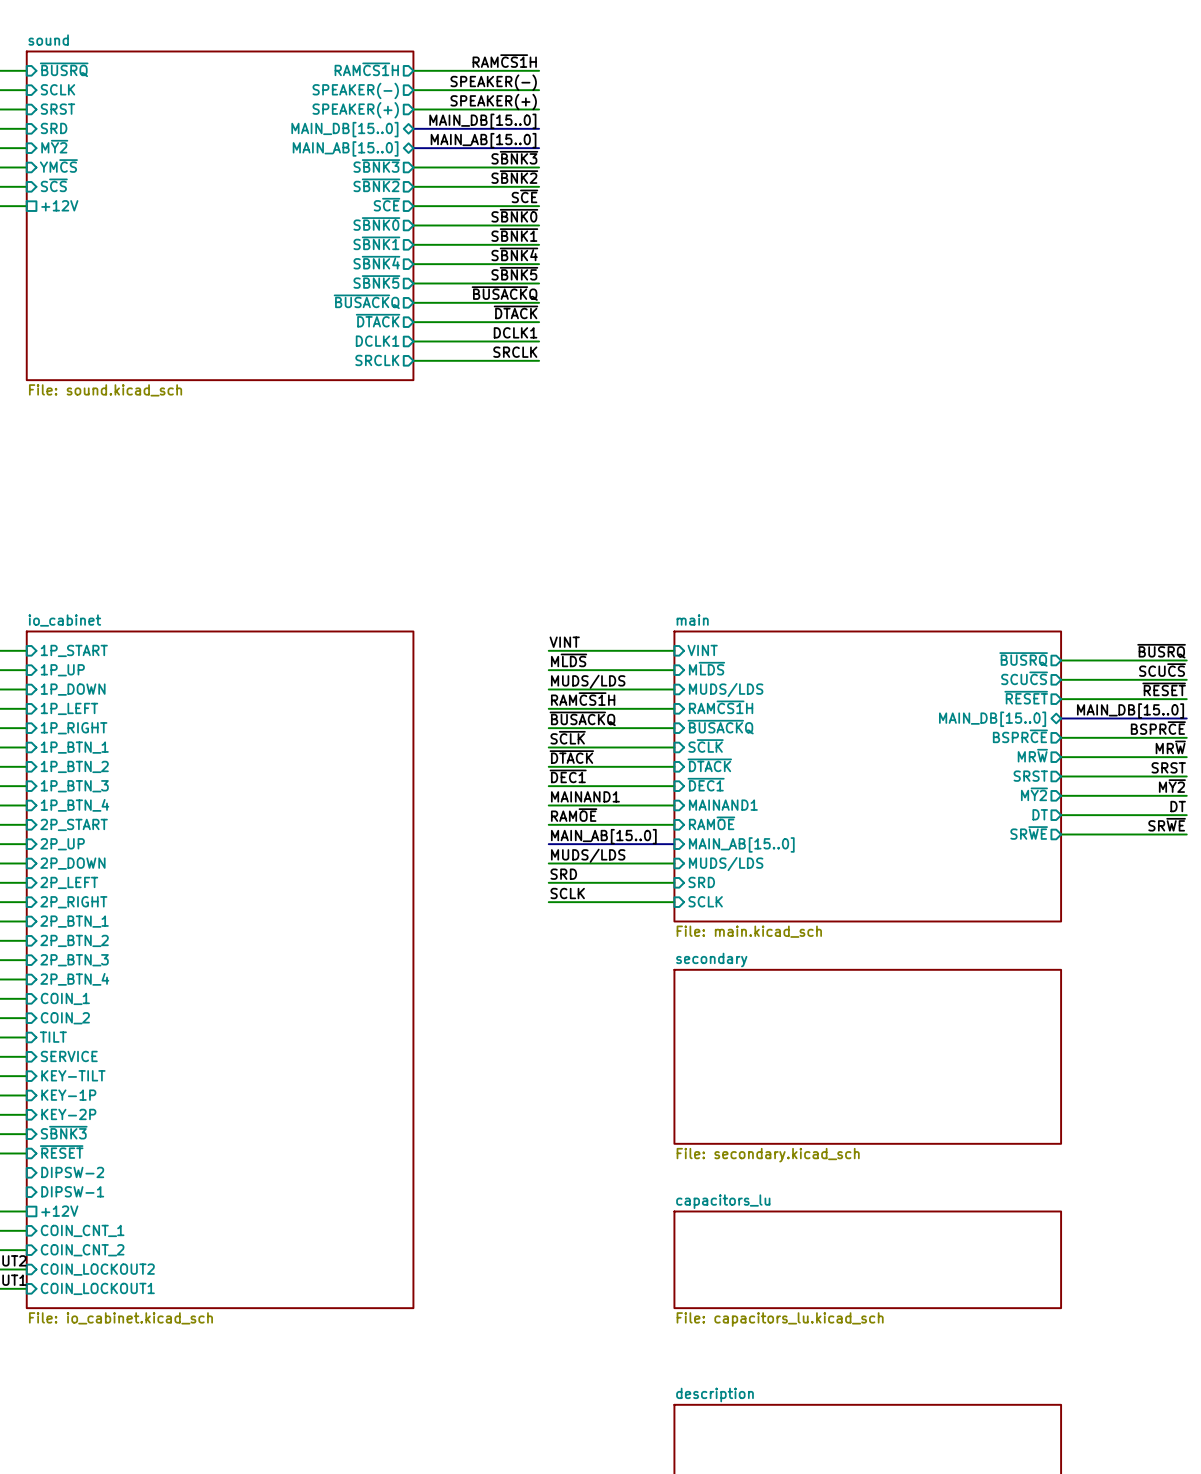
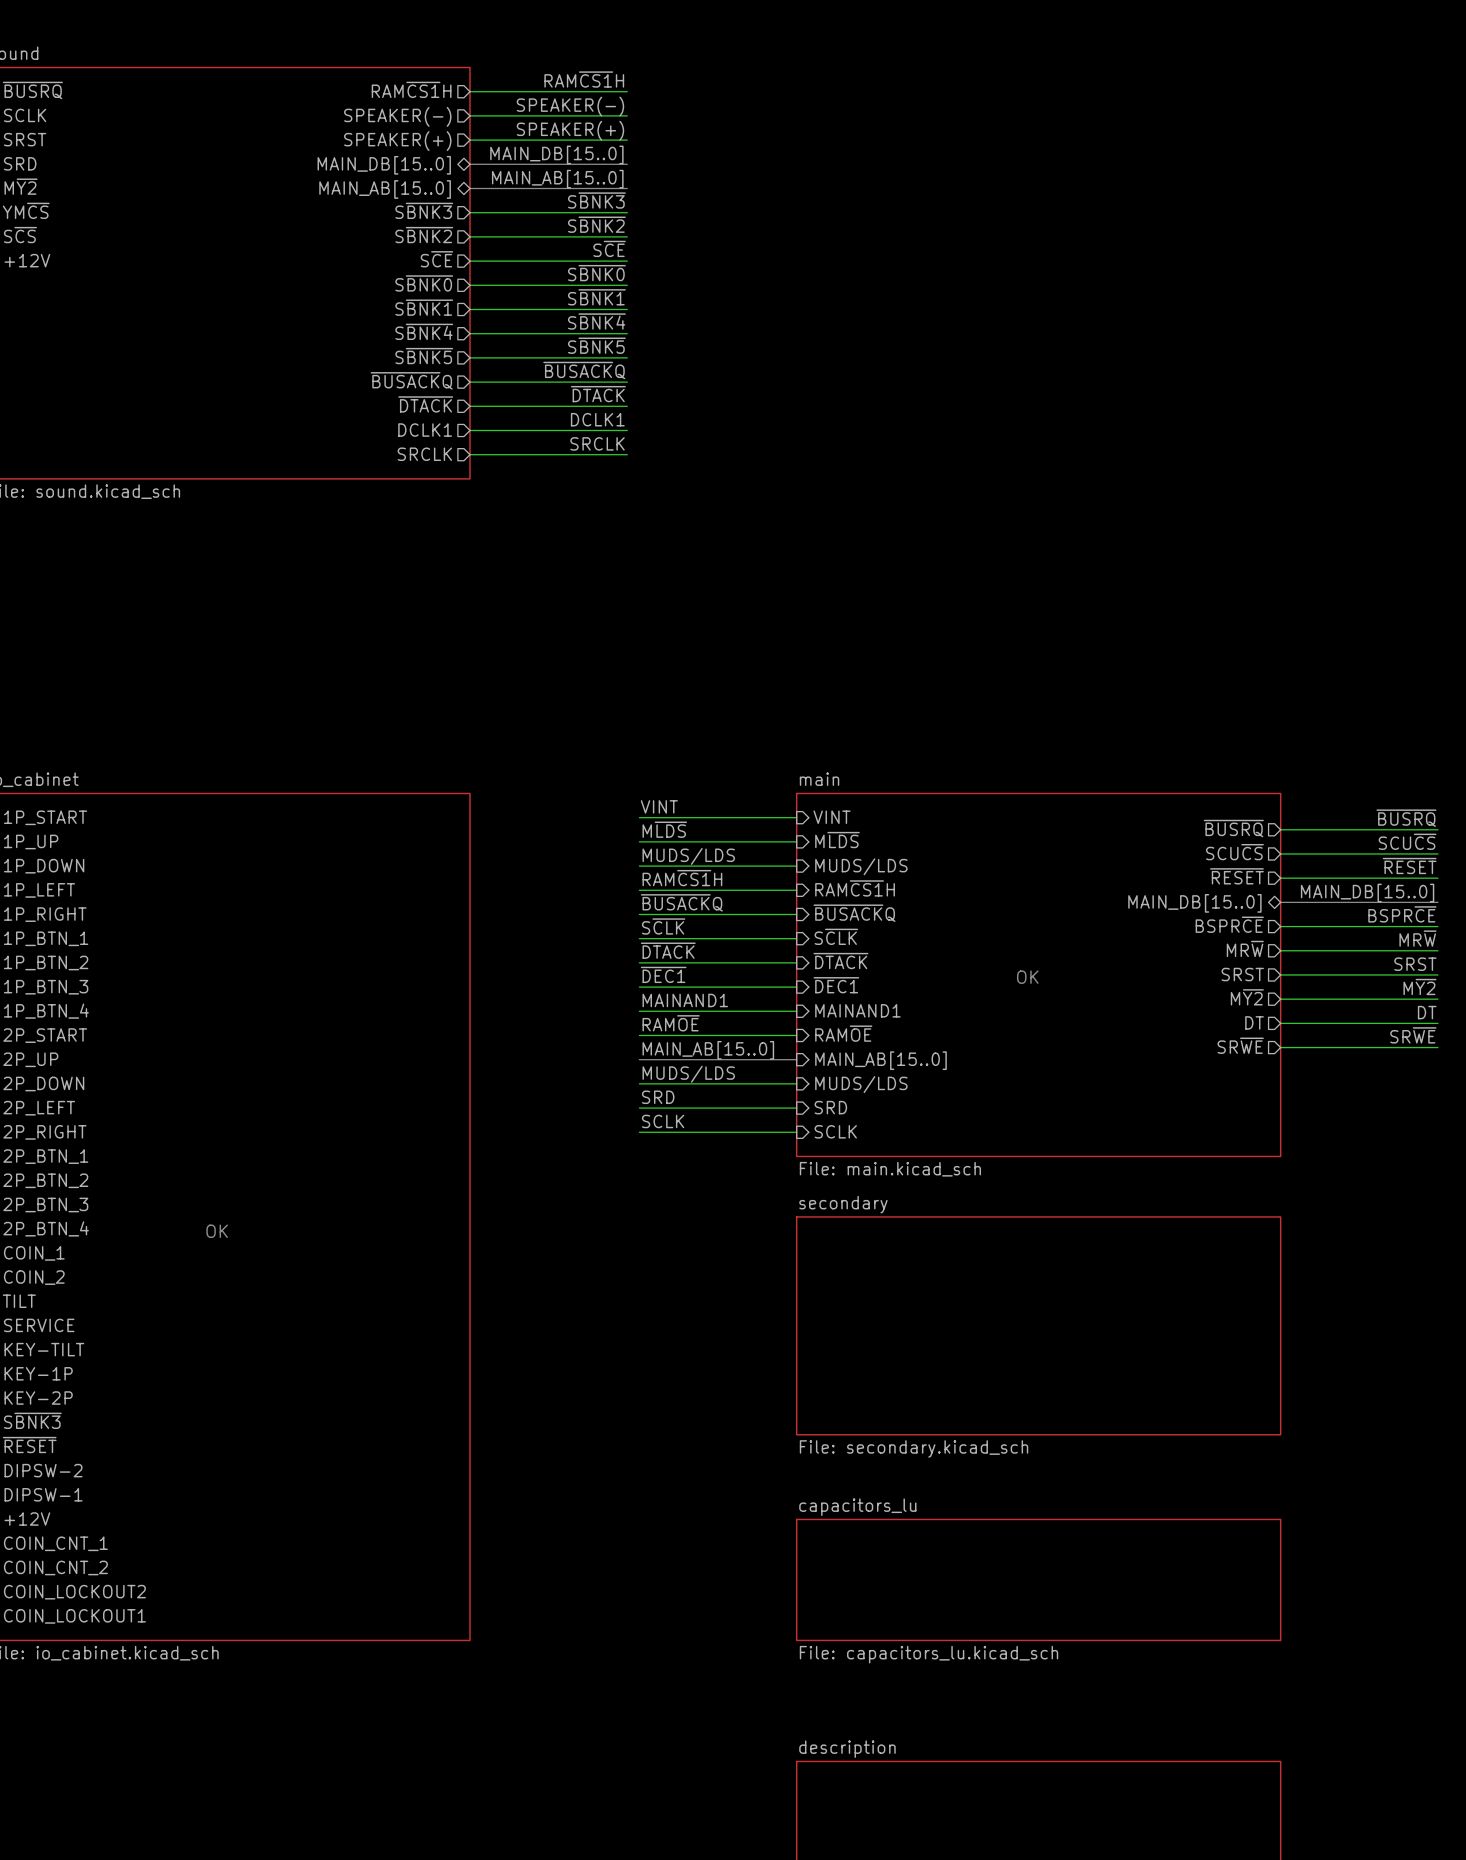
text: none -> OK (1027, 977)
text: none -> OK (217, 1231)

